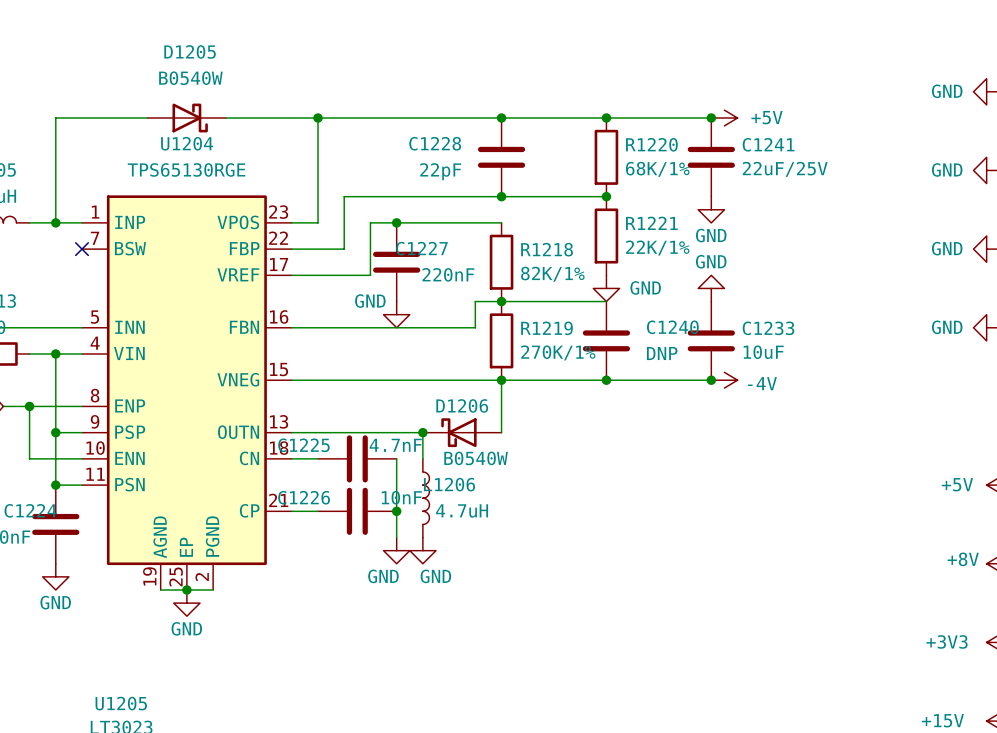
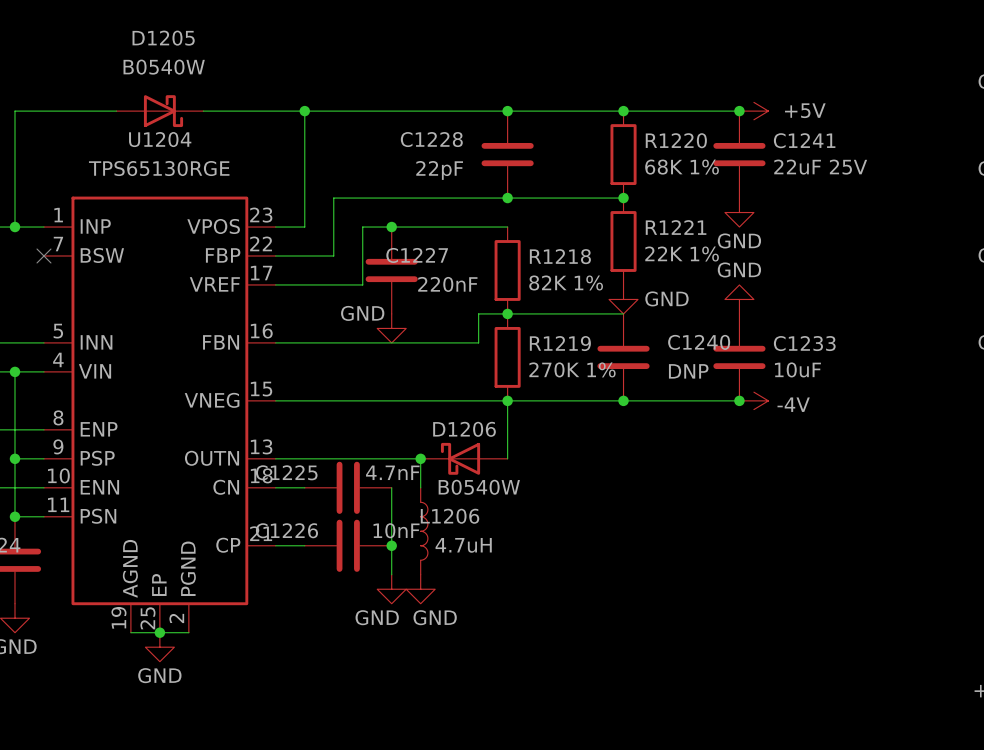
R1220 value: 68K/1% (657, 169) -> 68K 1% (682, 167)
C1241 value: 22uF/25V (785, 169) -> 22uF 25V (820, 167)
R1221 value: 22K/1% (657, 248) -> 22K 1% (682, 254)
R1218 value: 82K/1% (552, 274) -> 82K 1% (566, 282)
R1219 value: 270K/1% (558, 352) -> 270K 1% (572, 369)

